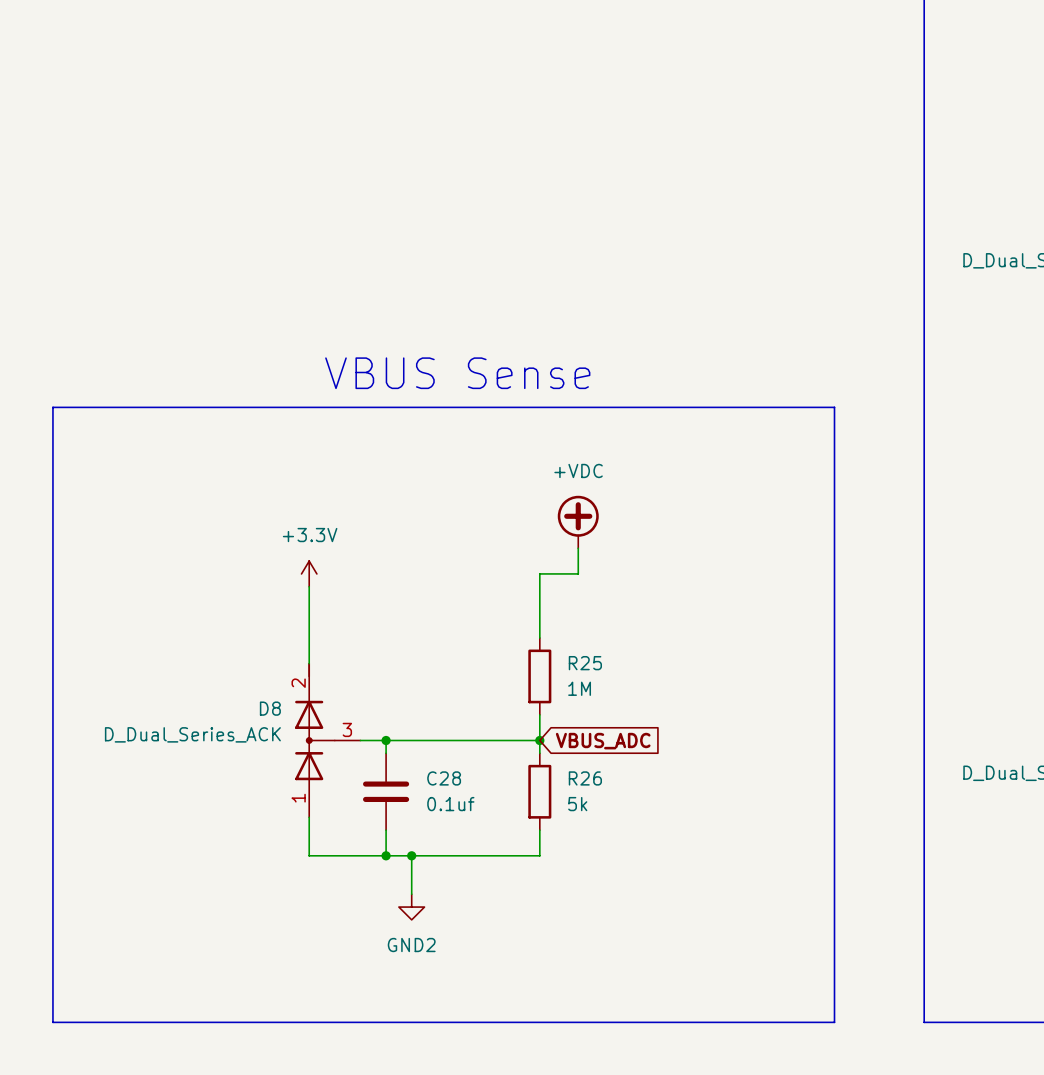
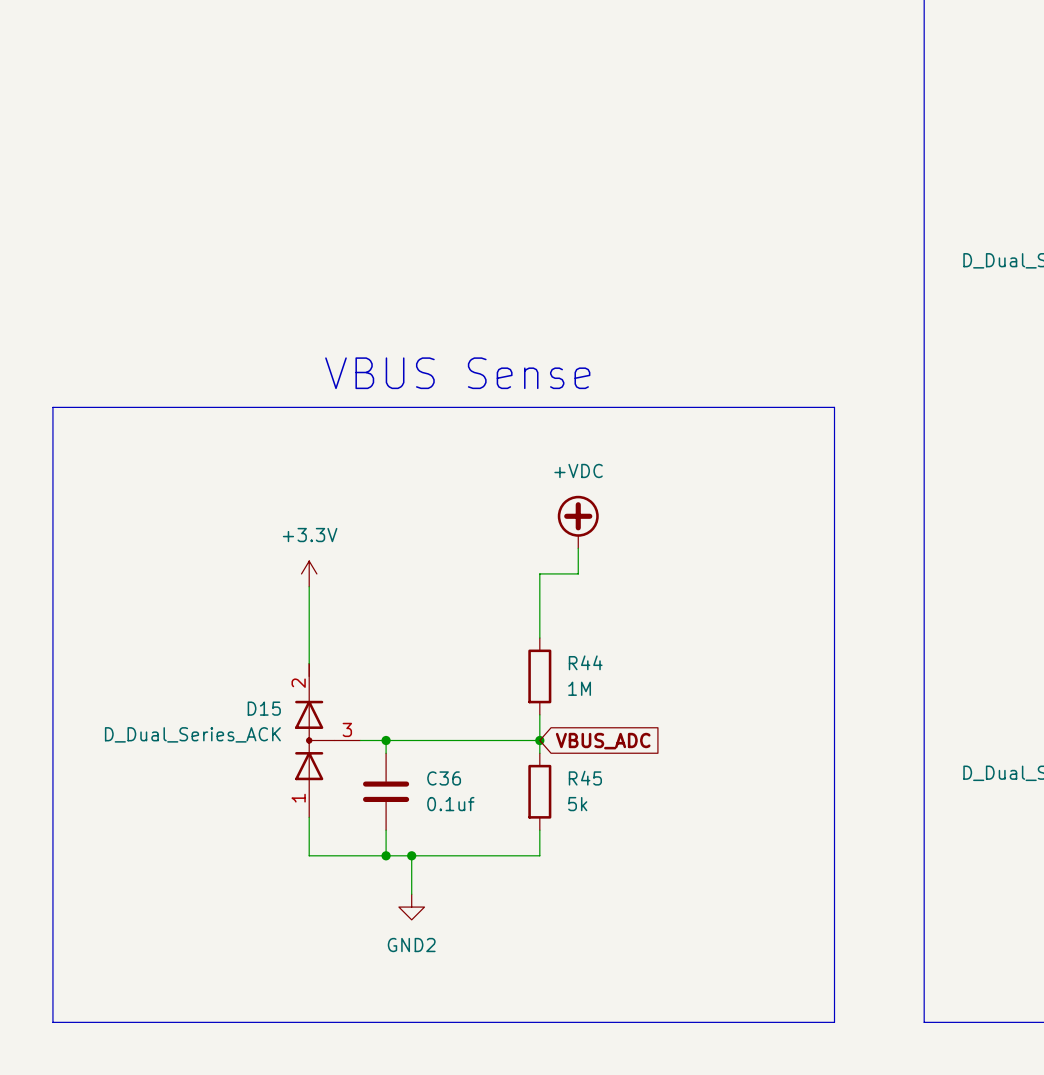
R25 name: R25 (585, 663) -> R44 (585, 662)
D8 name: D8 (270, 708) -> D15 (264, 708)
C28 name: C28 (444, 778) -> C36 (444, 778)
R26 name: R26 (585, 778) -> R45 (585, 778)

